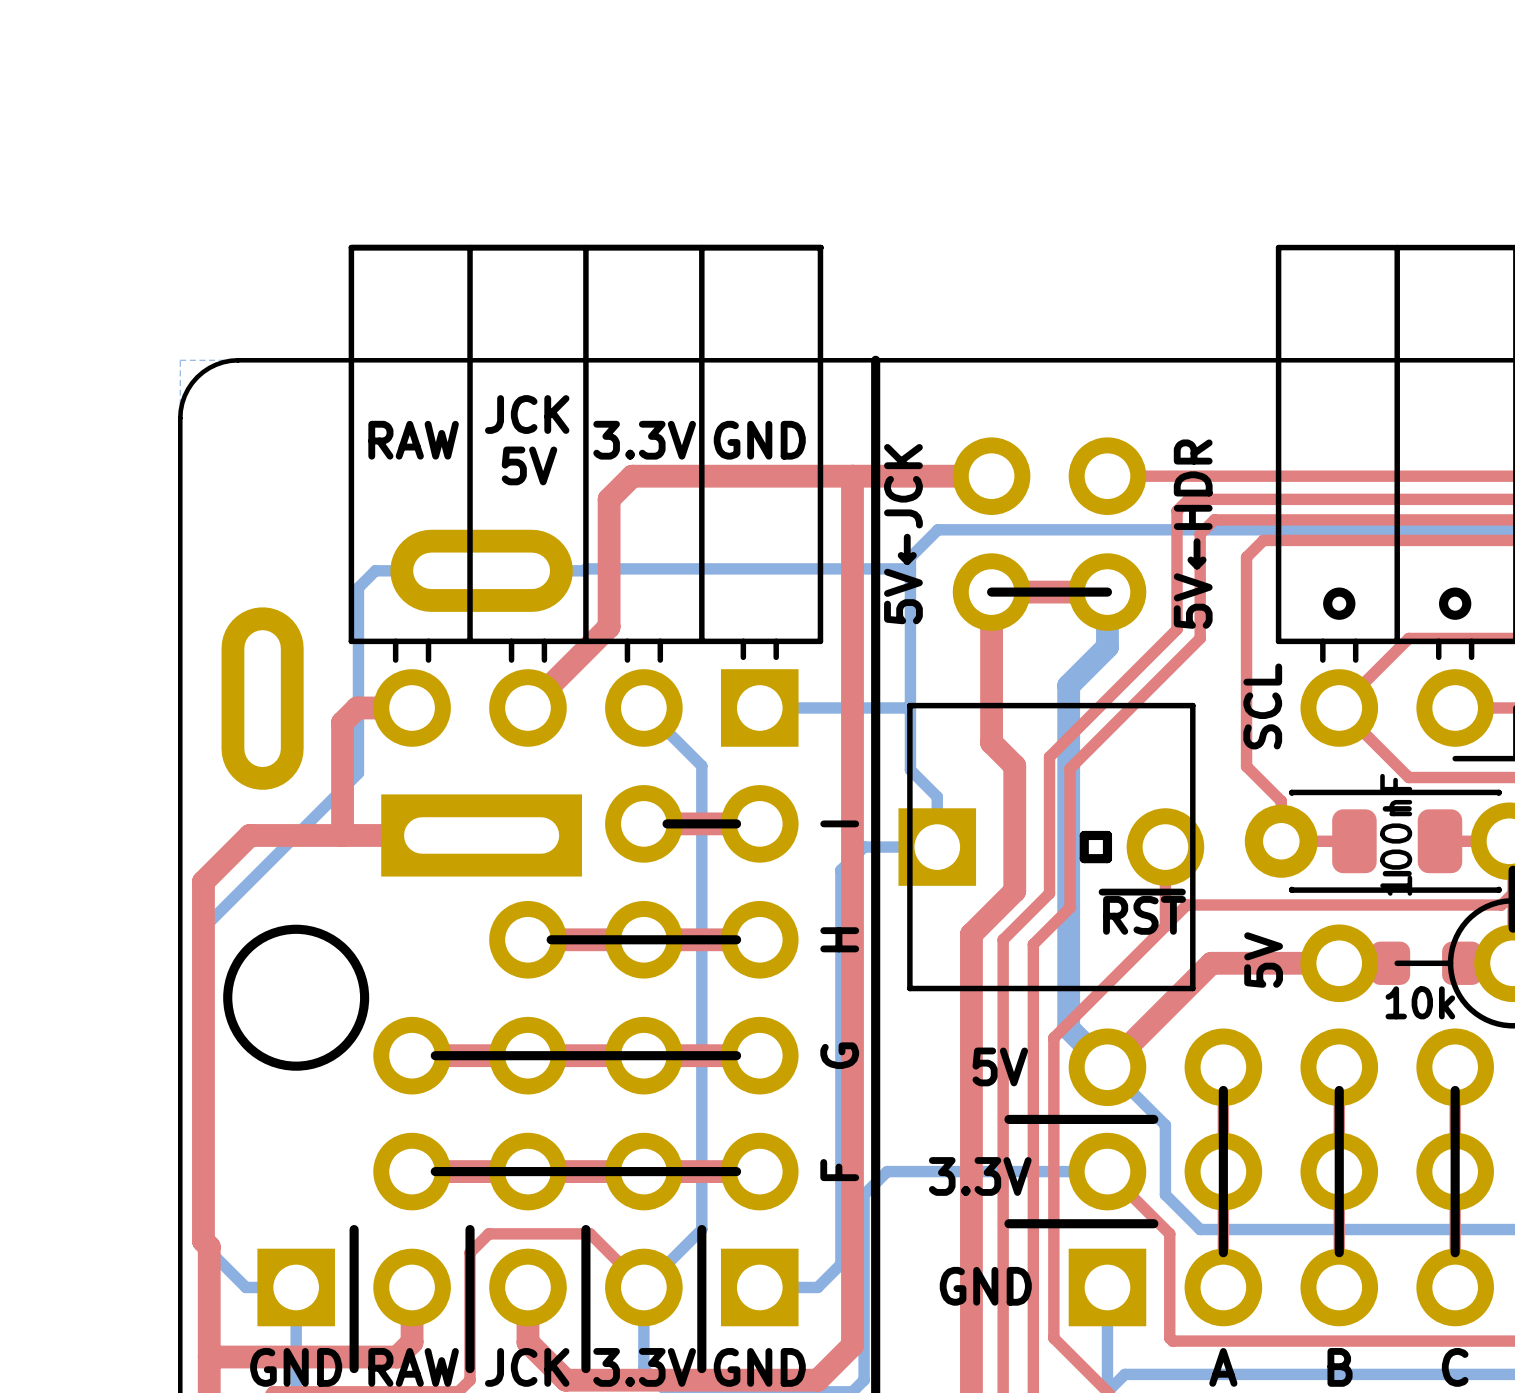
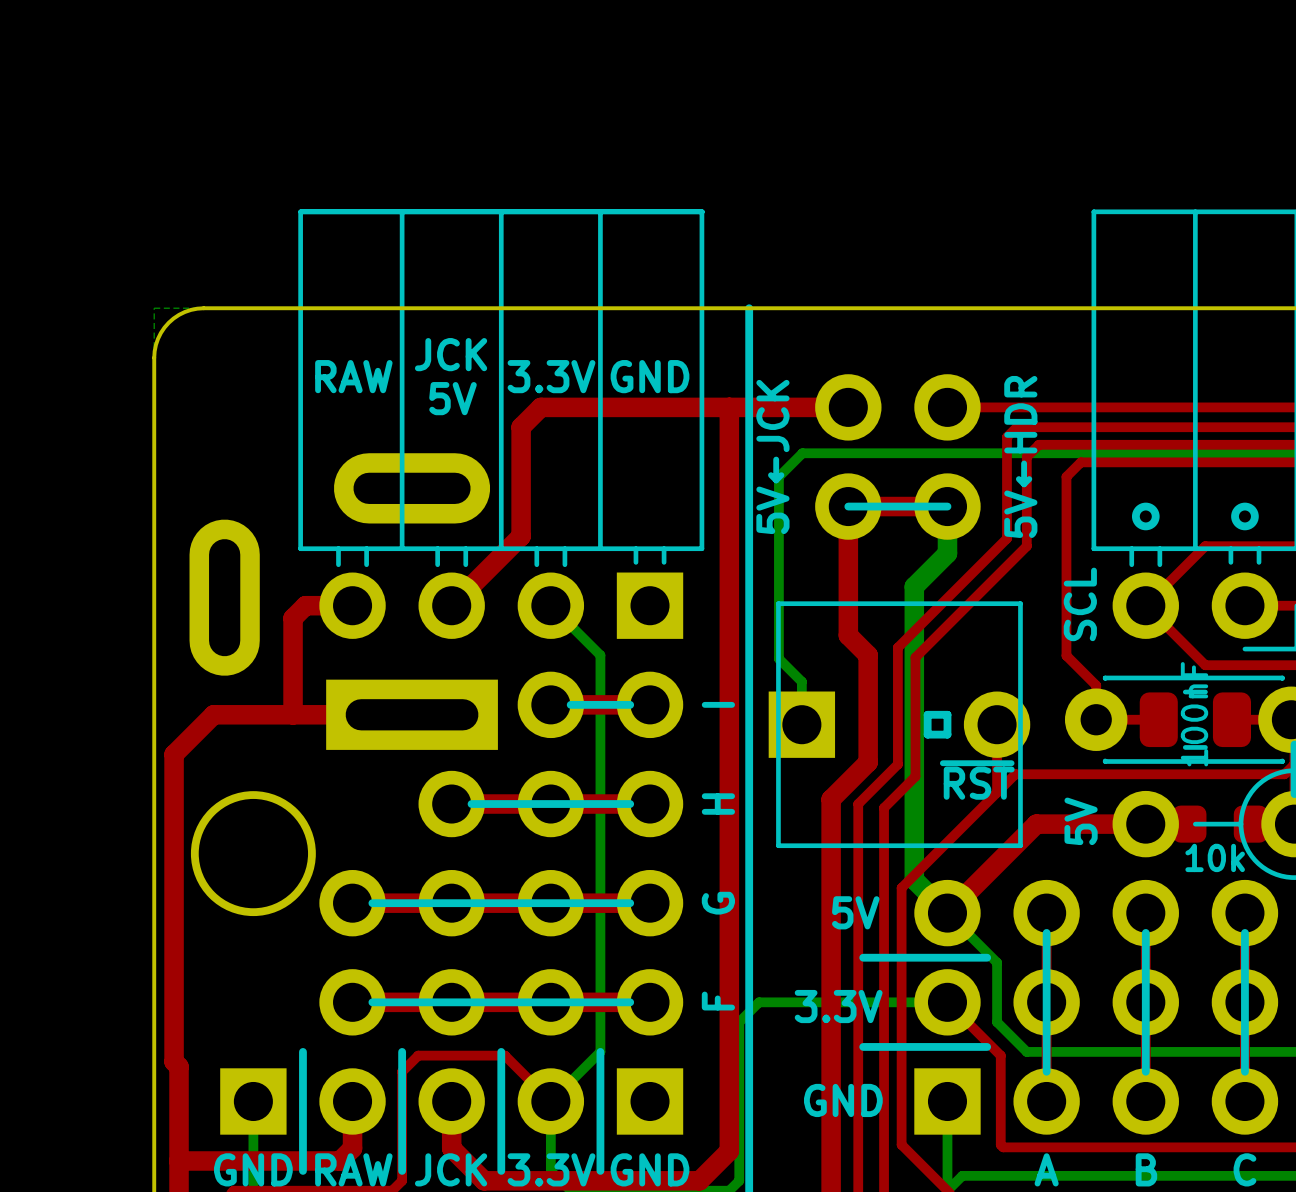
bottom track: (910, 568) (375, 570) (358, 587) (358, 773) (203, 928) (203, 1244) (245, 1287) (296, 1287) -> none
bottom track: (759, 707) (910, 707) -> none
bottom track: (937, 847) (864, 847) (840, 870) (840, 1264) (817, 1287) (759, 1287) -> none

